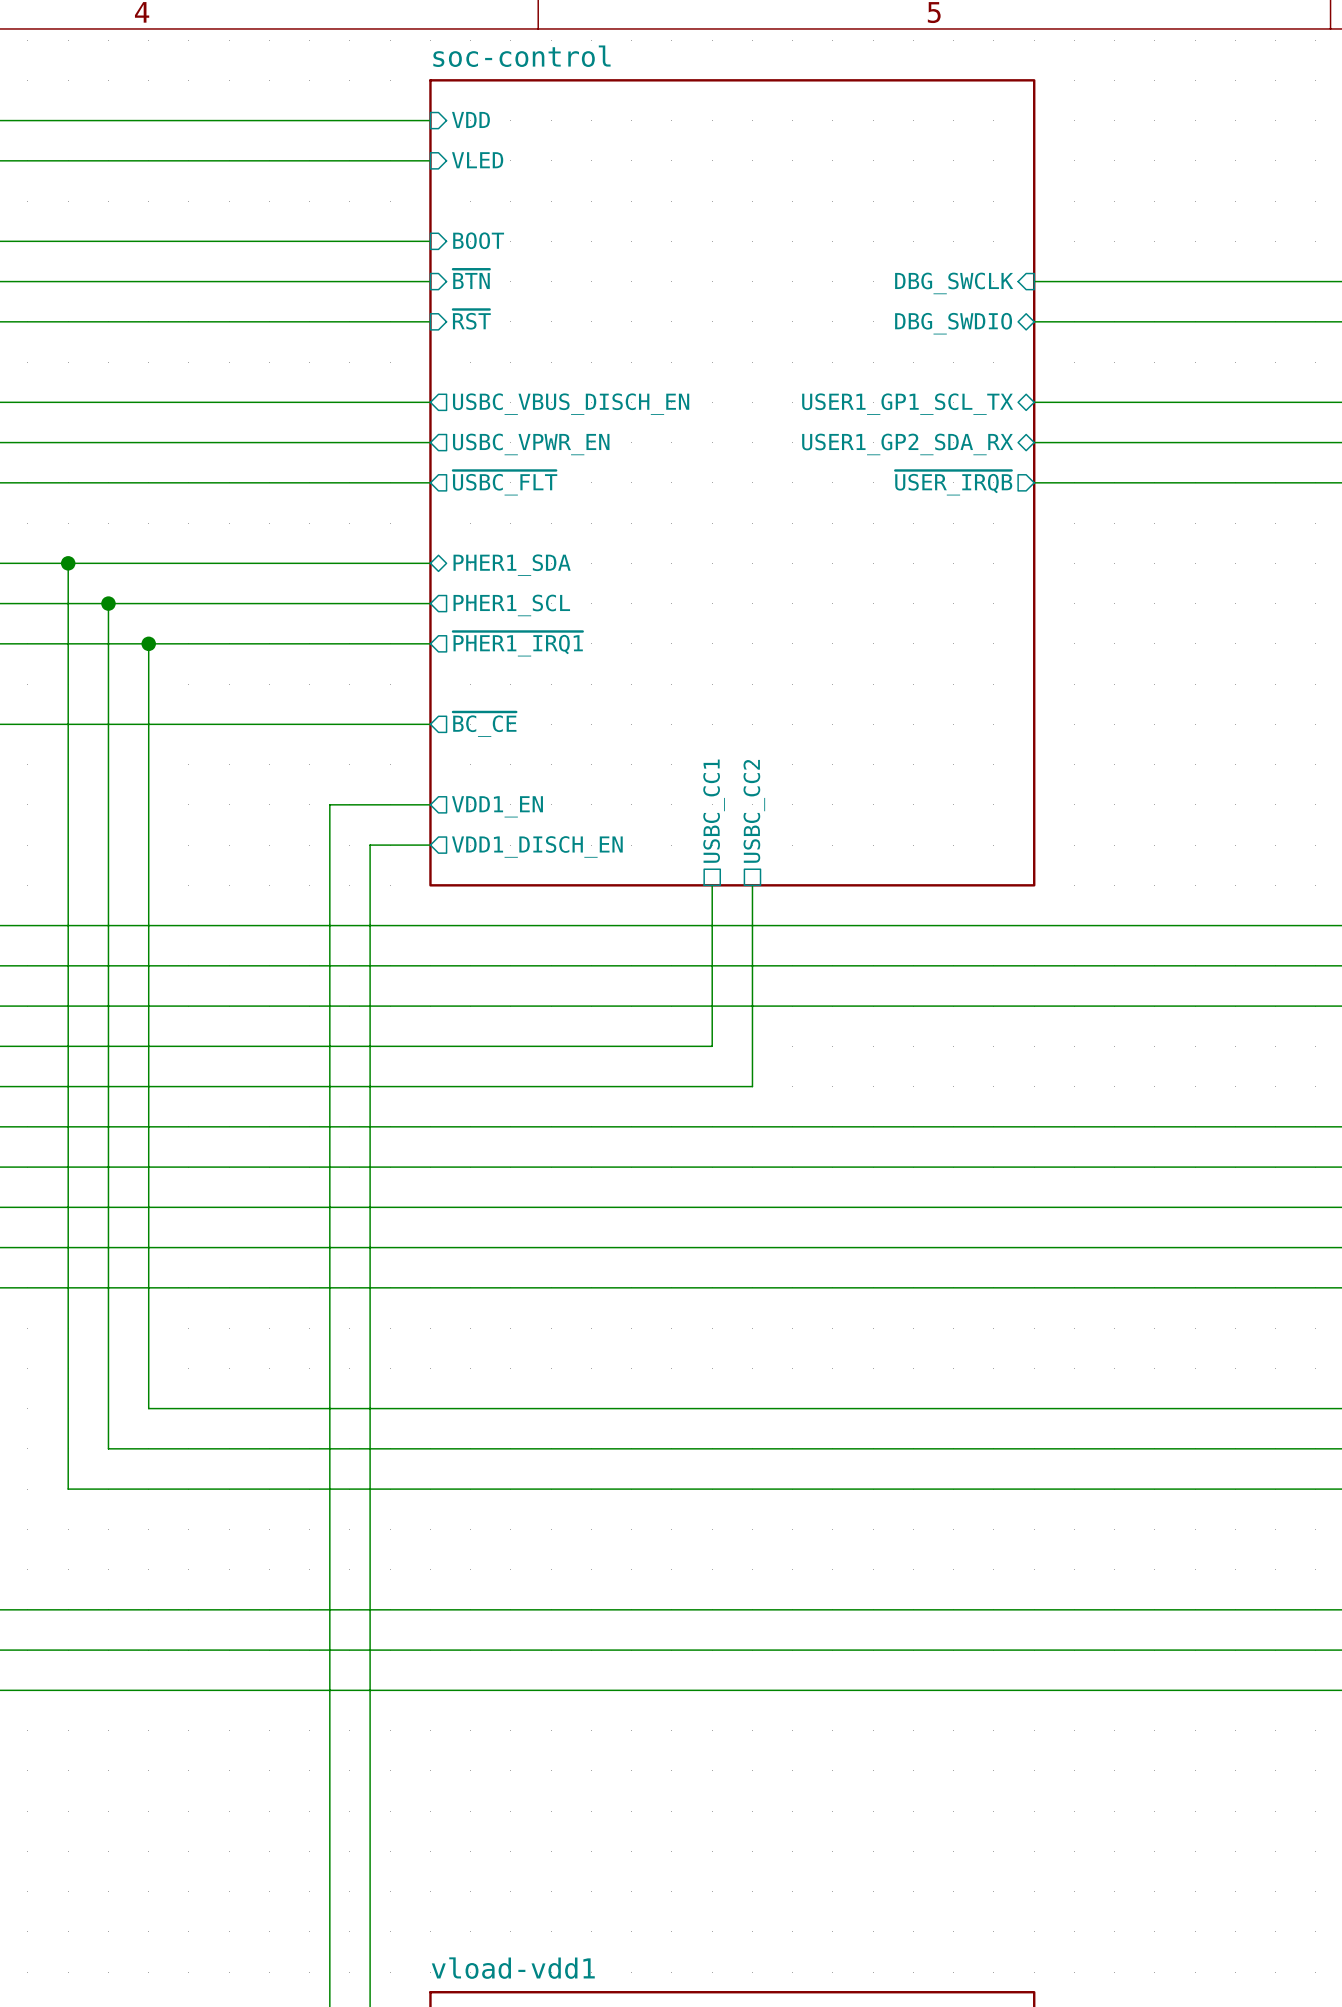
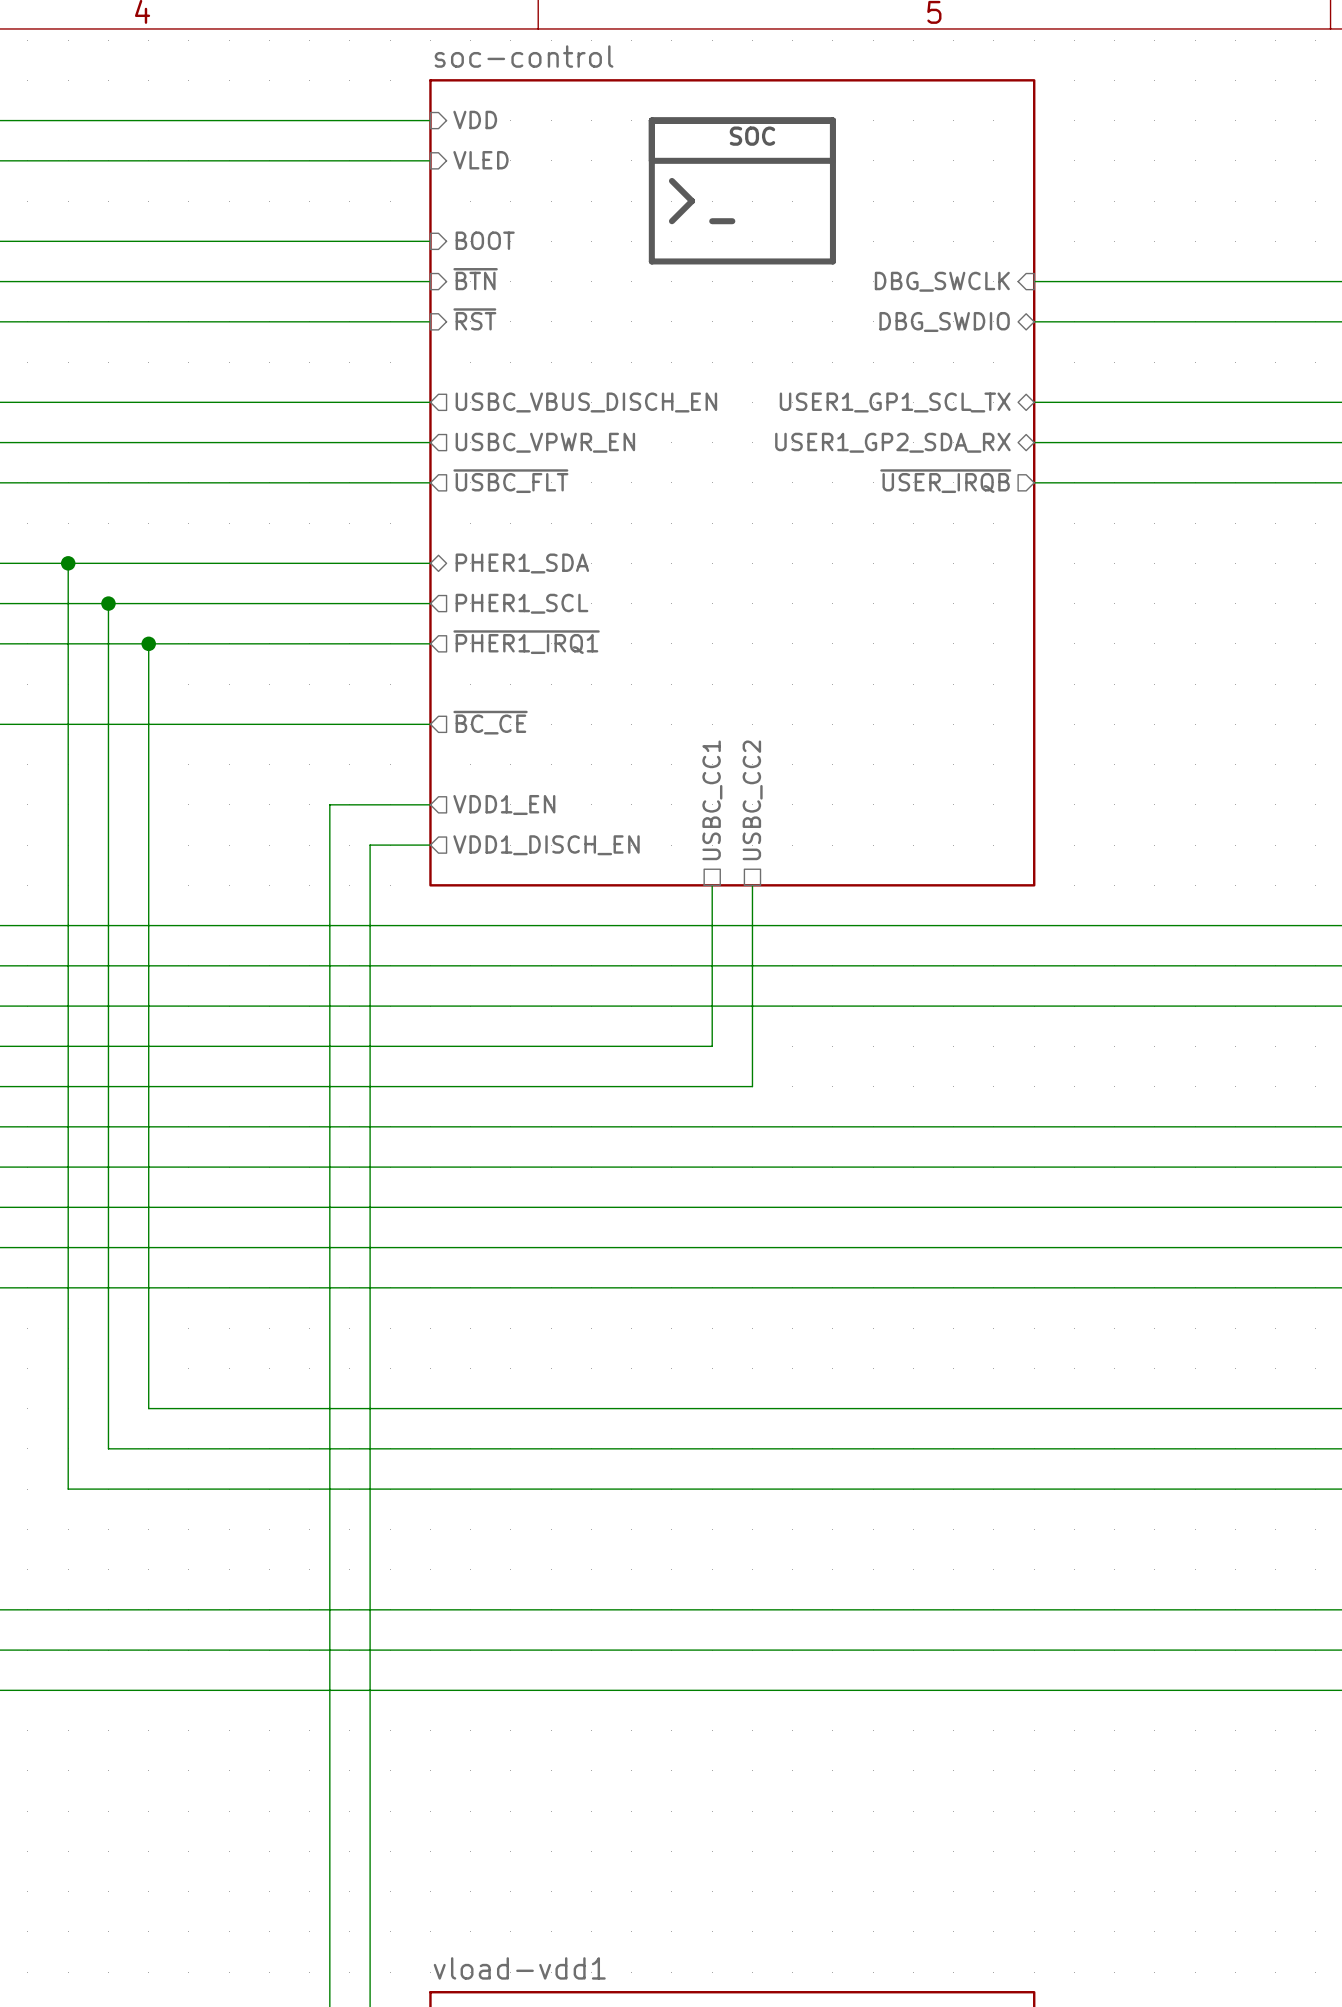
line: none -> (651, 120) (832, 120) (832, 261) (651, 261) (651, 120)
text: none -> SOC (752, 136)
line: none -> (651, 160) (832, 160)
line: none -> (671, 180) (692, 201) (671, 221)
line: none -> (712, 221) (732, 221)

